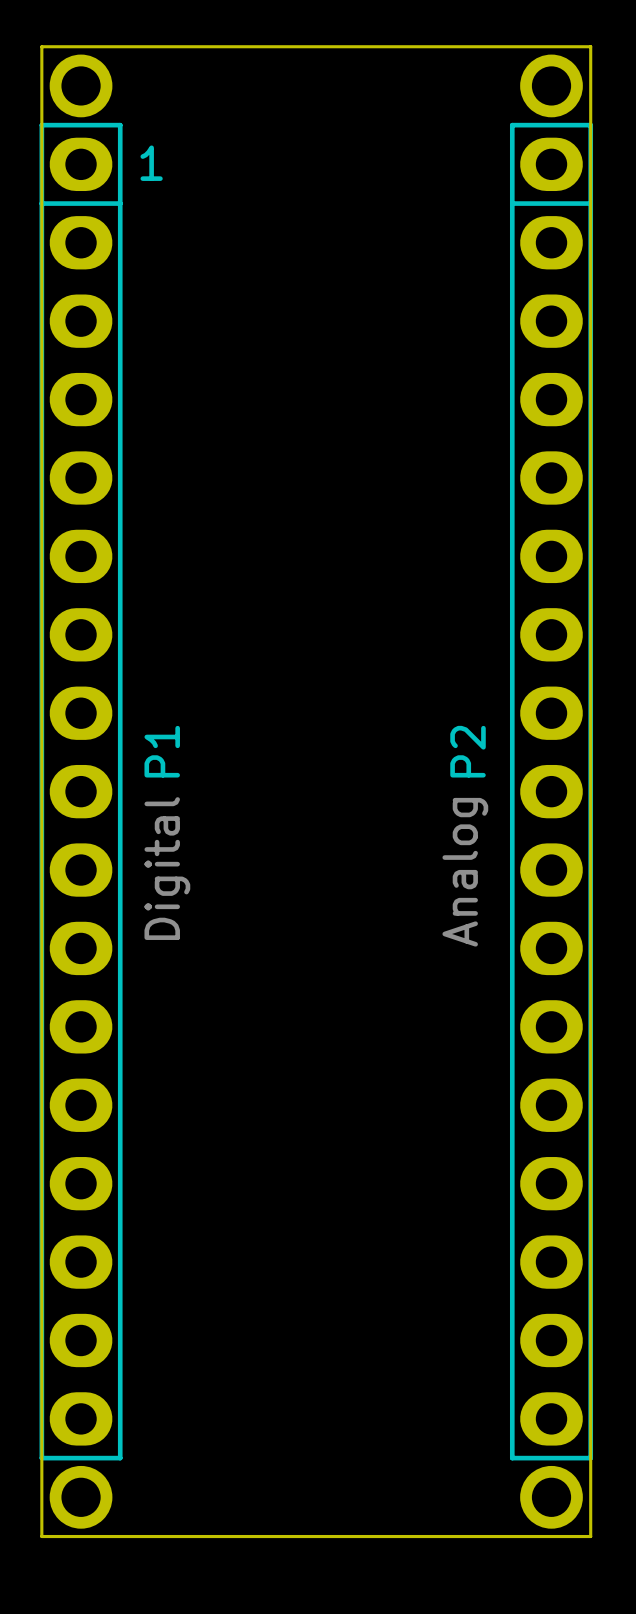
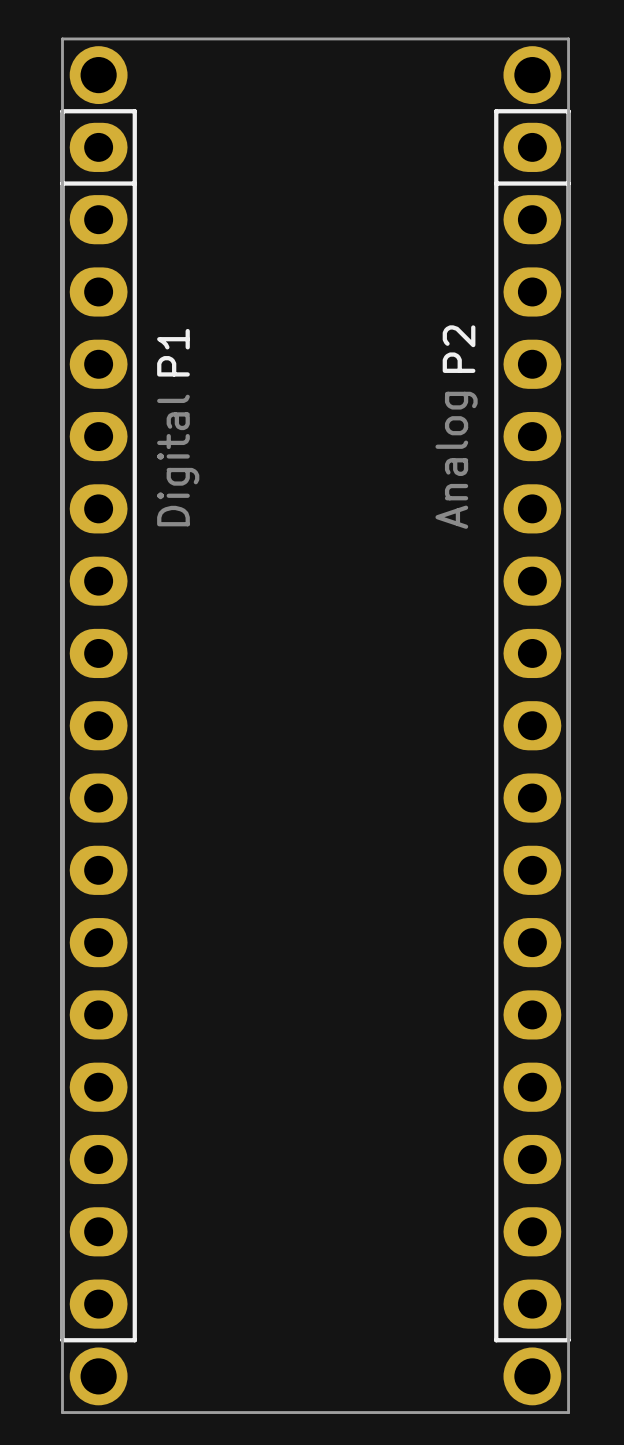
text: 1 (151, 163) -> none
P1 name position: P1 (162, 751) -> P1 (173, 352)
P2 name position: P2 (468, 751) -> P2 (459, 349)
P1 value position: Digital (167, 868) -> Digital (178, 460)
P2 value position: Analog (465, 872) -> Analog (456, 460)

